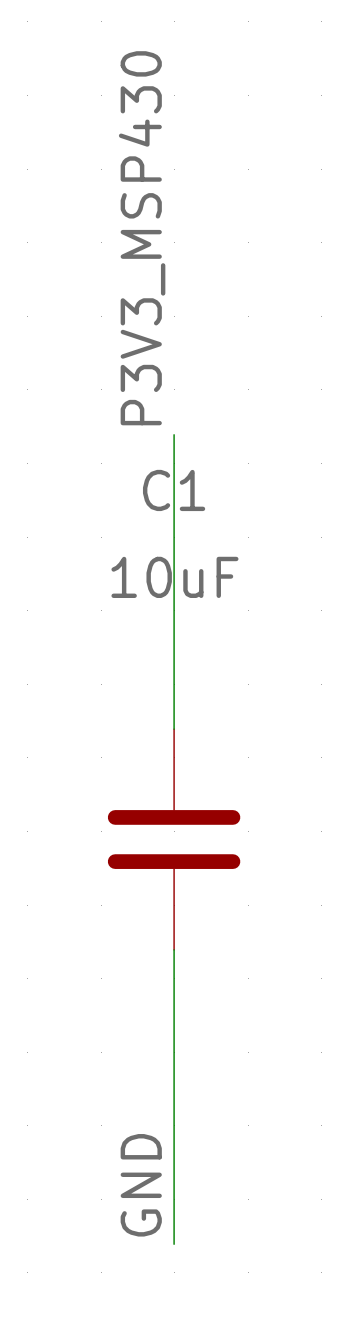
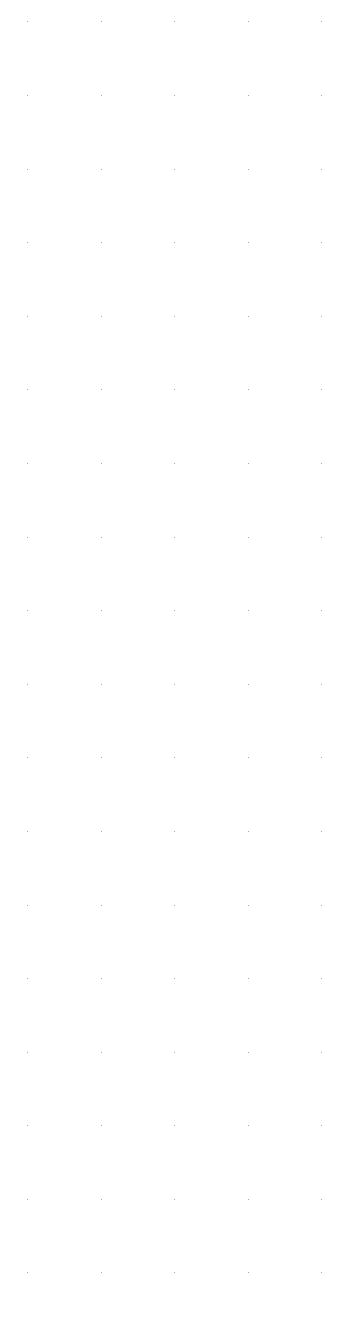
label: P3V3_MSP430 (142, 238) -> none
wire: (174, 434) (174, 729) -> none
C1: 10uF (174, 839) -> none
wire: (174, 949) (174, 1244) -> none
label: GND (141, 1185) -> none

